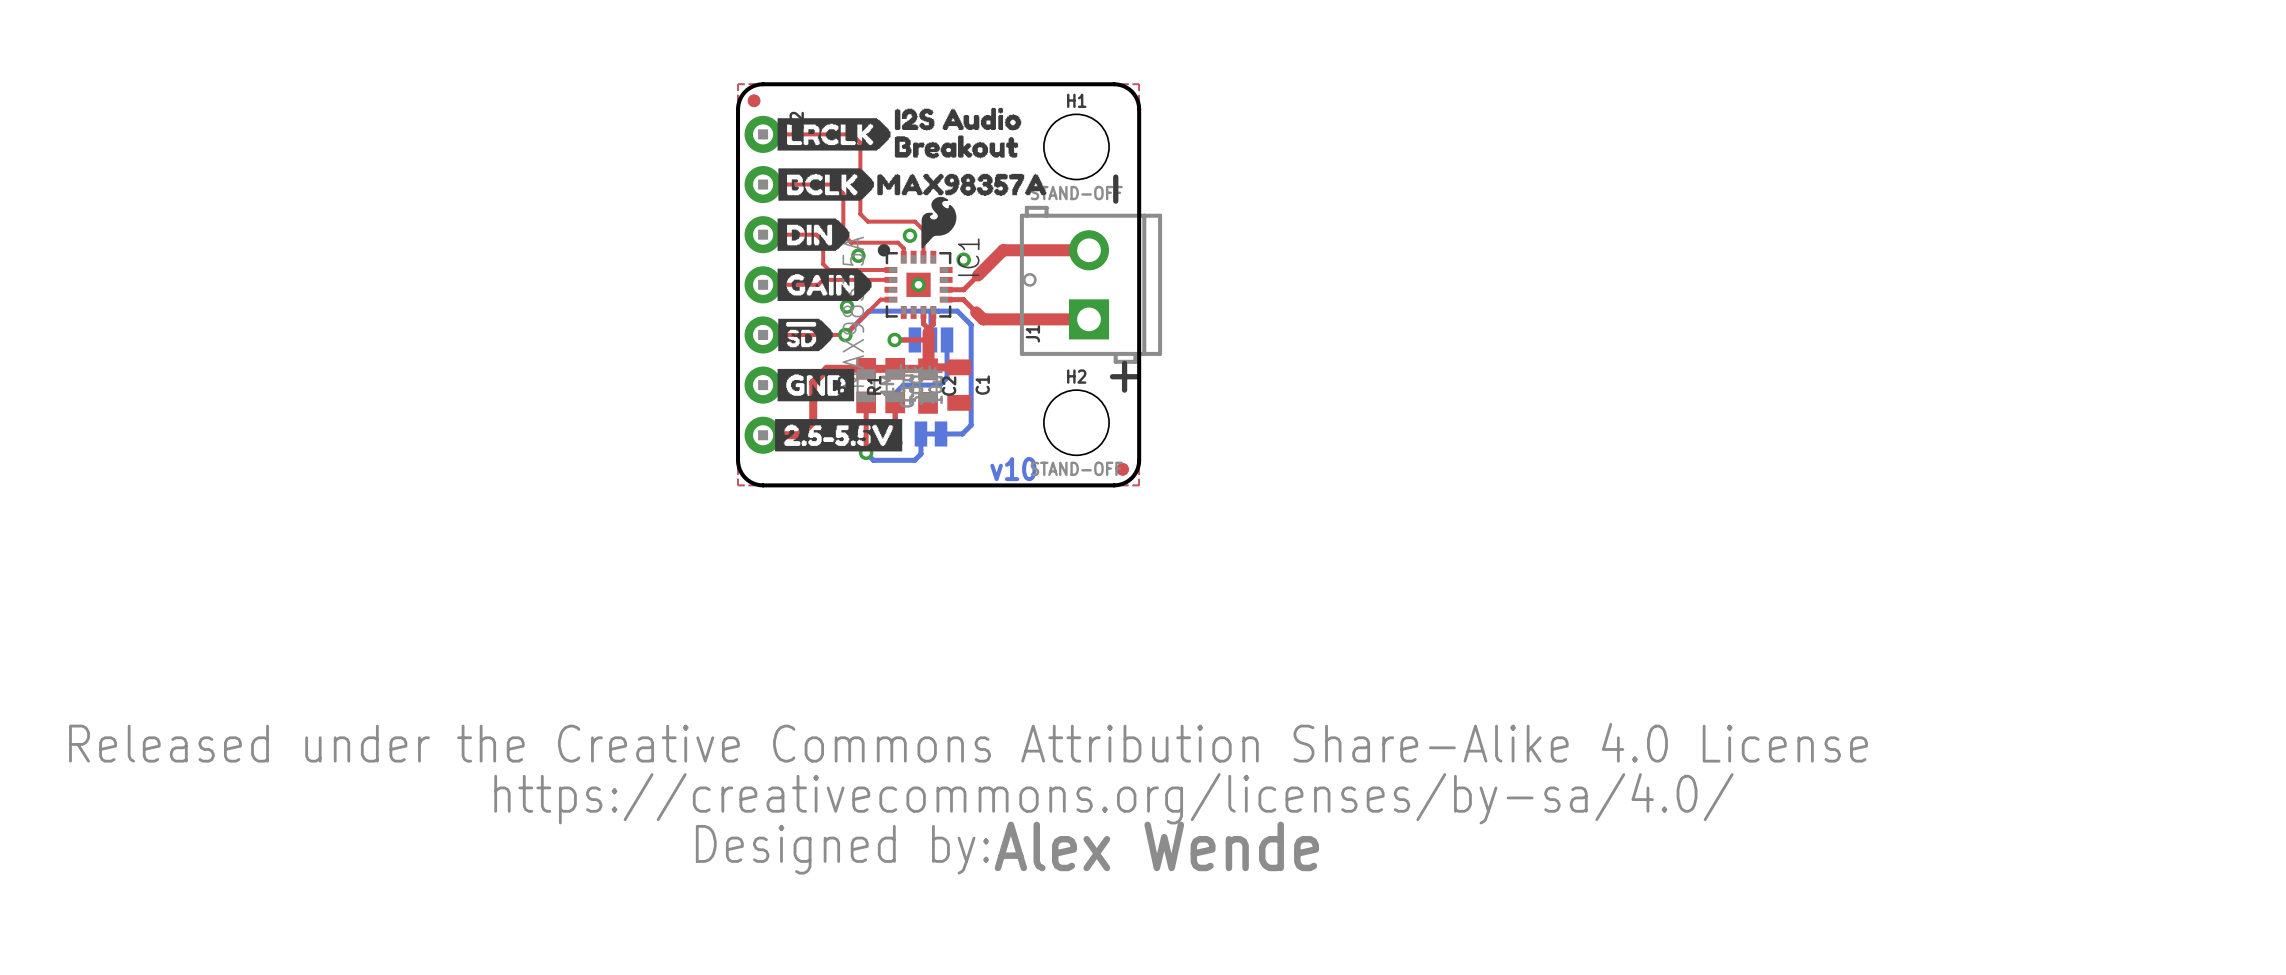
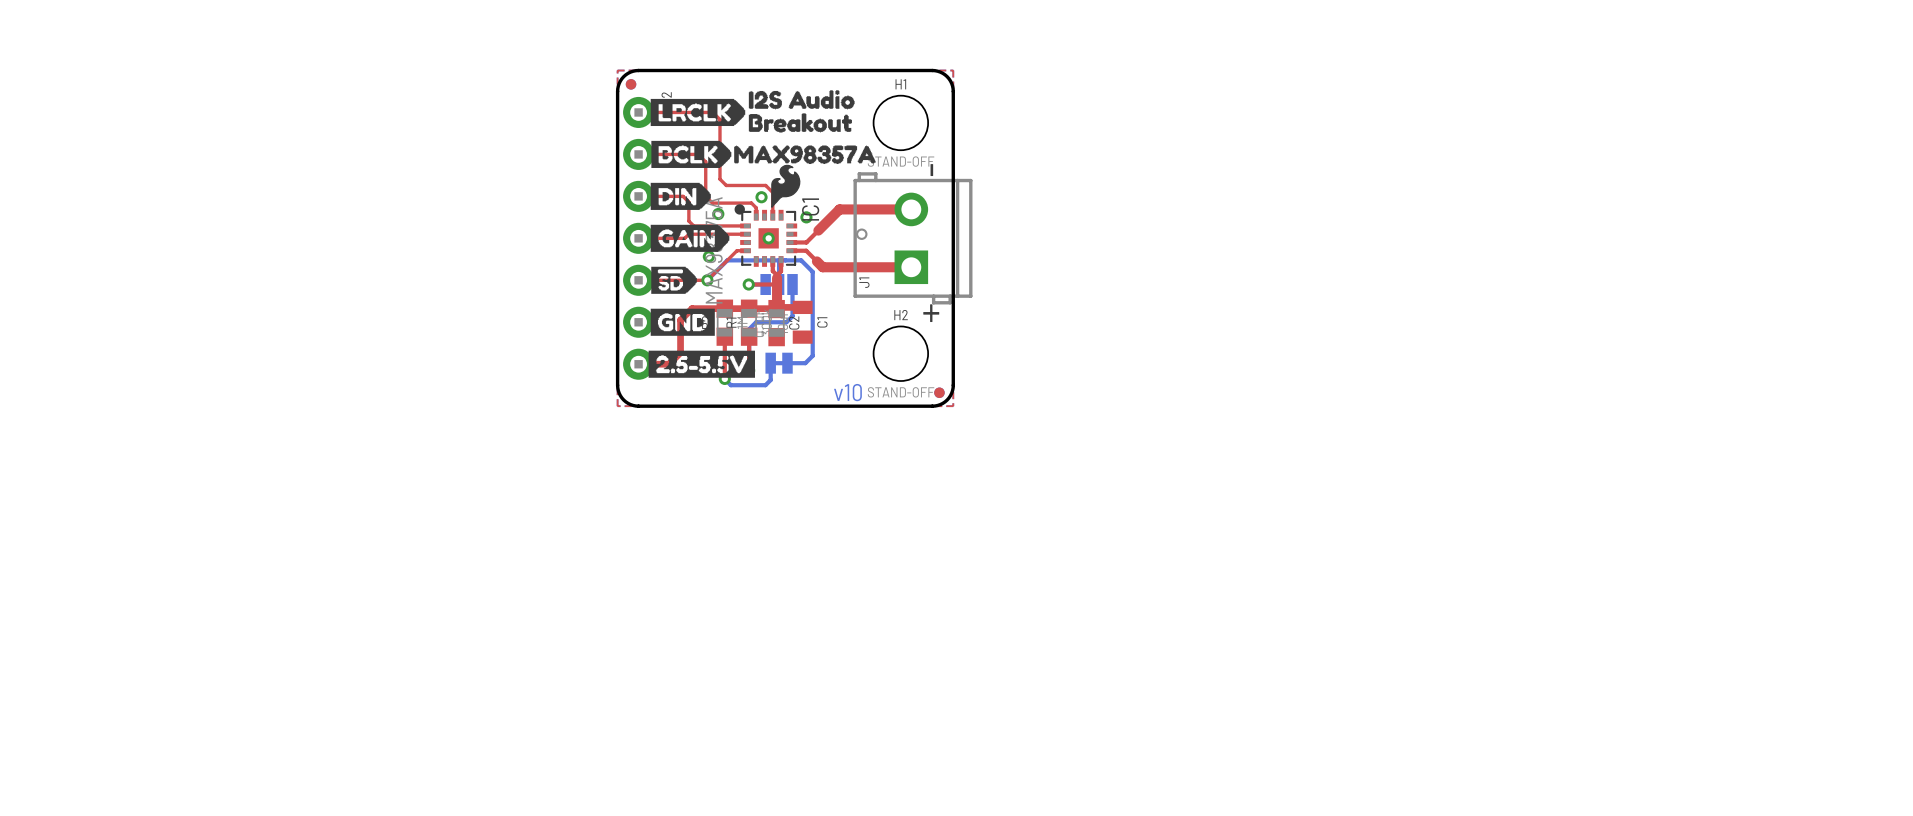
drawing: [69, 722, 1868, 875] -> none
text: Alex Wende (1156, 846) -> none

